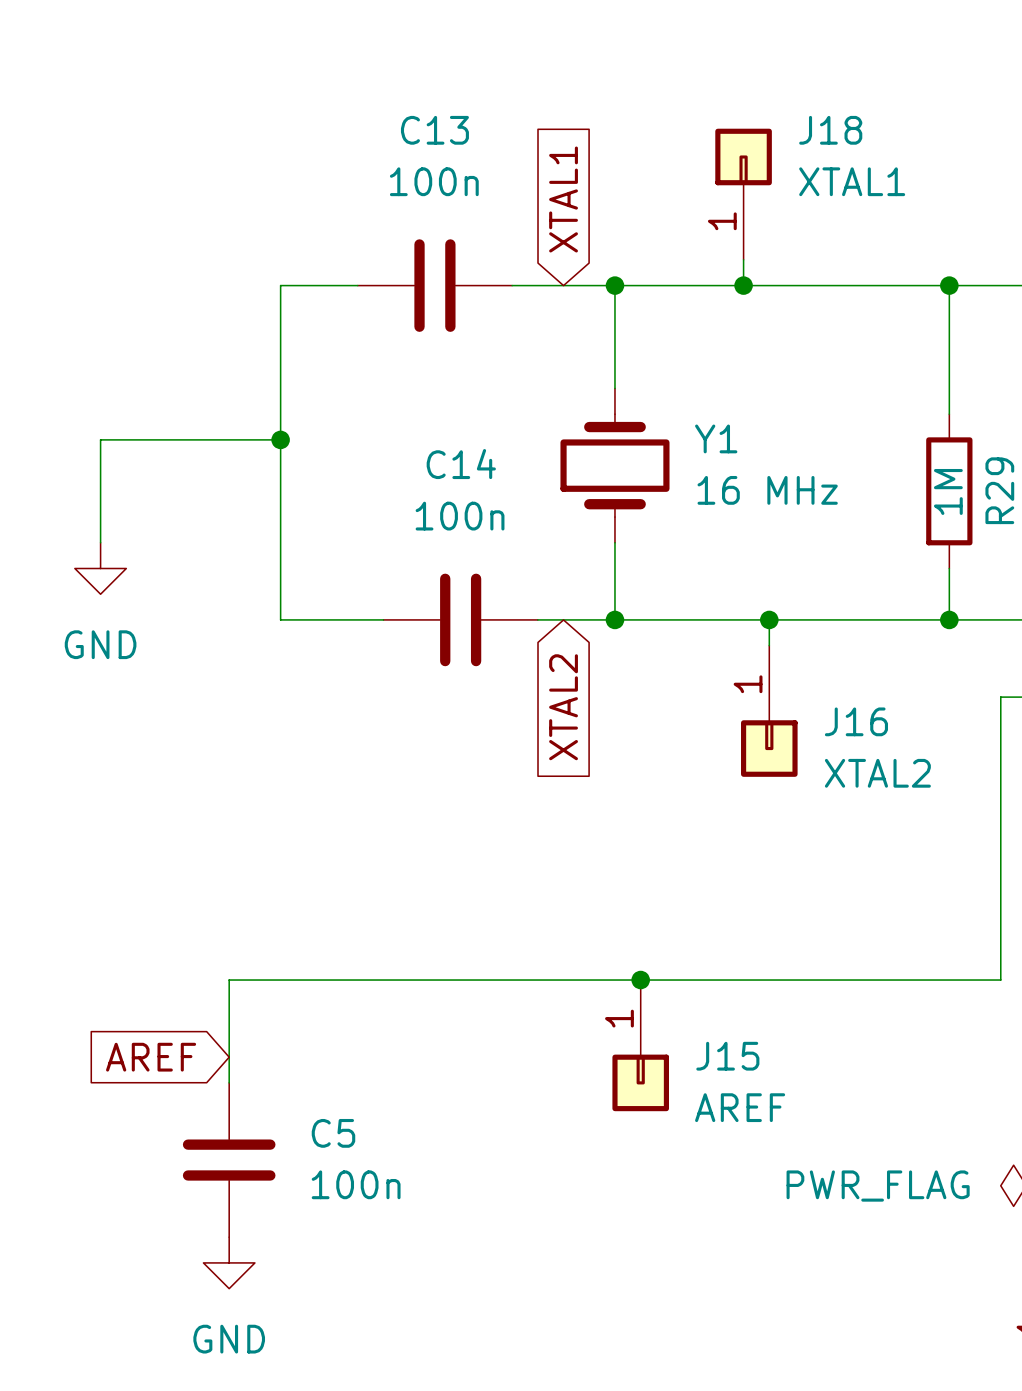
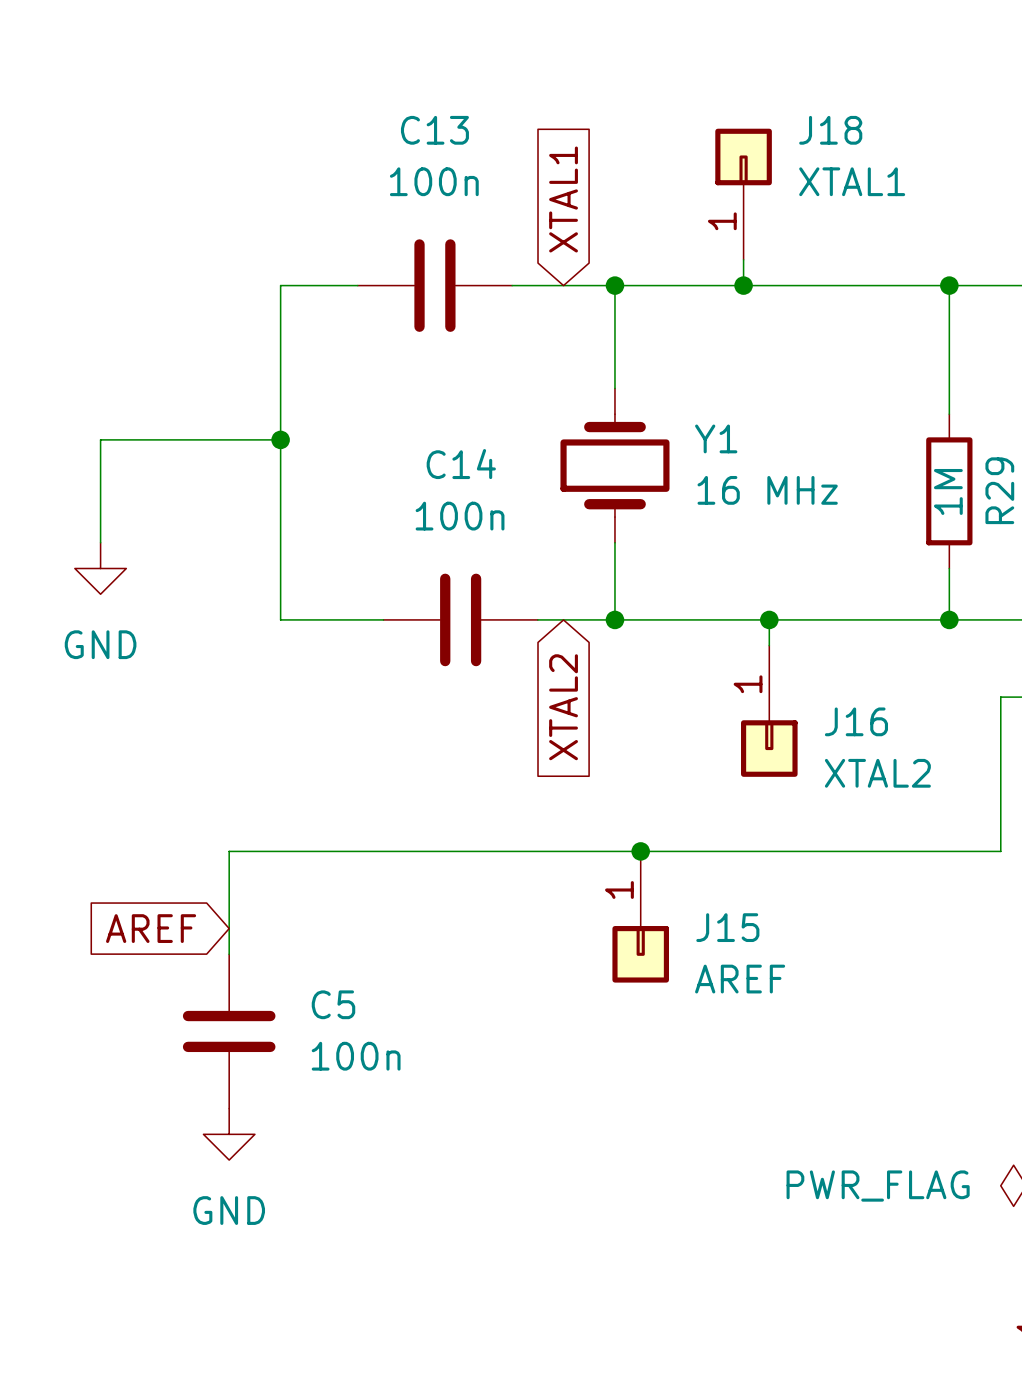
junction: none -> (640, 851)
wire: (1000, 851) (1000, 980) (229, 980) (229, 1082) -> (1000, 851) (229, 851) (229, 954)
junction: (640, 980) -> none
J15 position: (640, 1045) -> (640, 917)
global label position: AREF (151, 1057) -> AREF (151, 928)
C5 position: (229, 1160) -> (229, 1031)
power symbol position: GND (229, 1262) -> GND (229, 1134)

